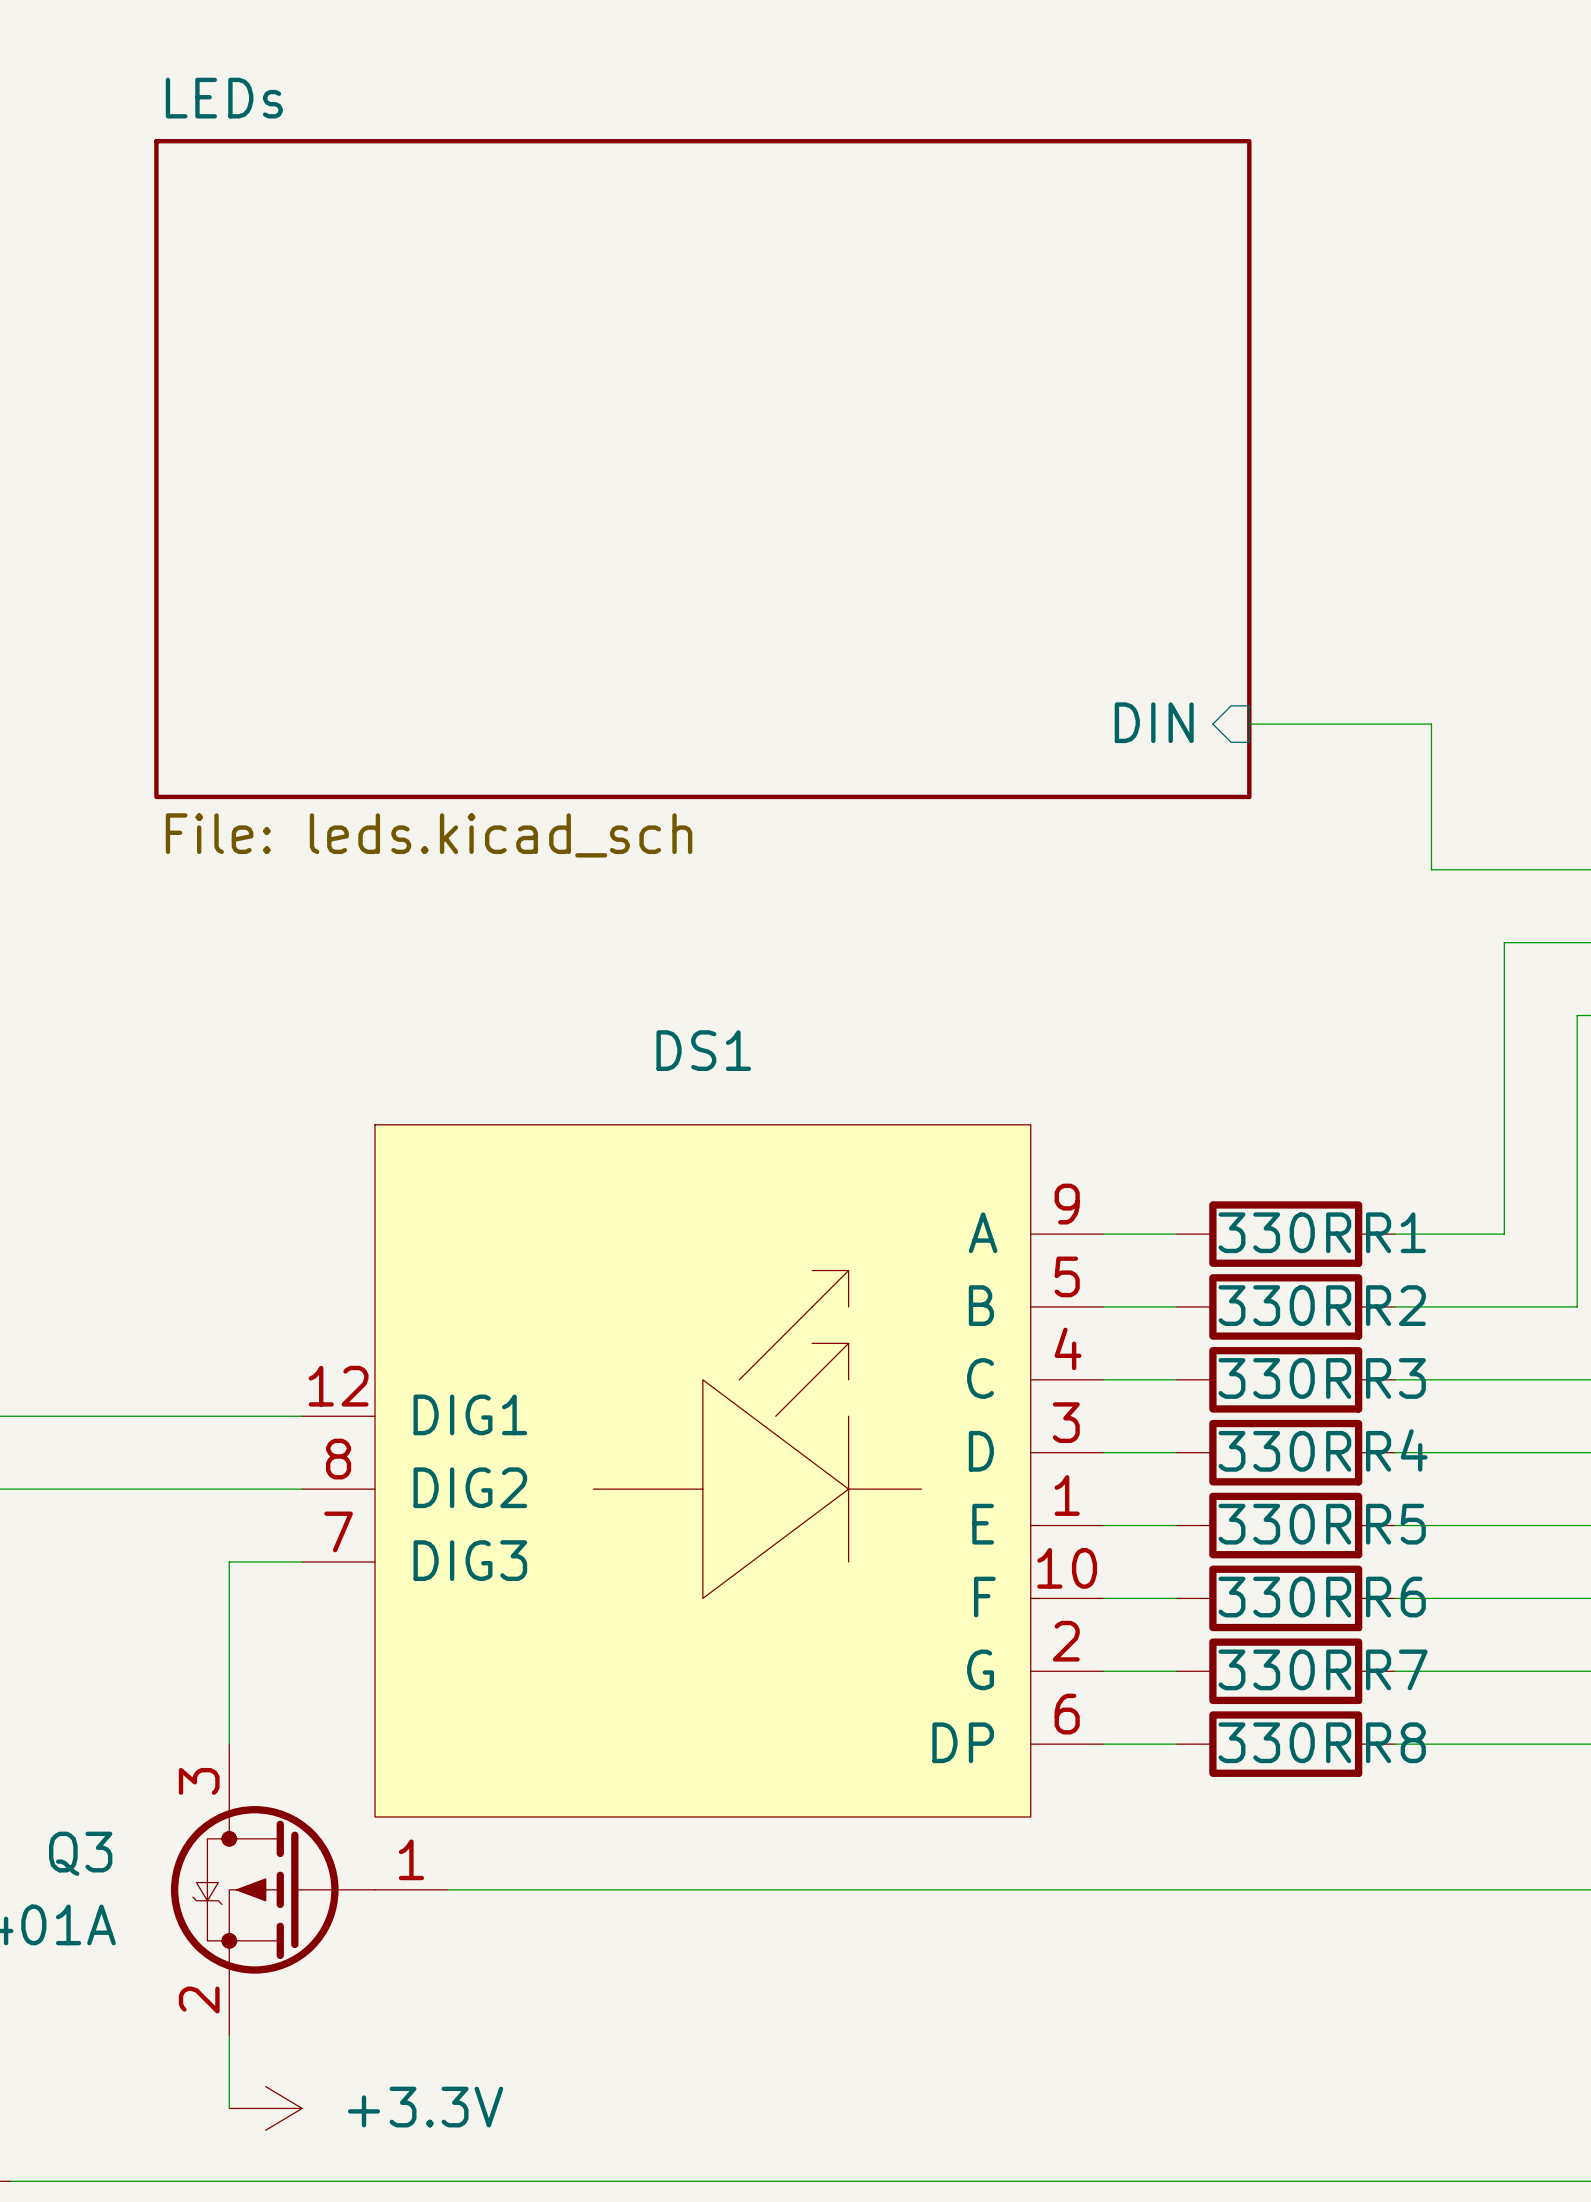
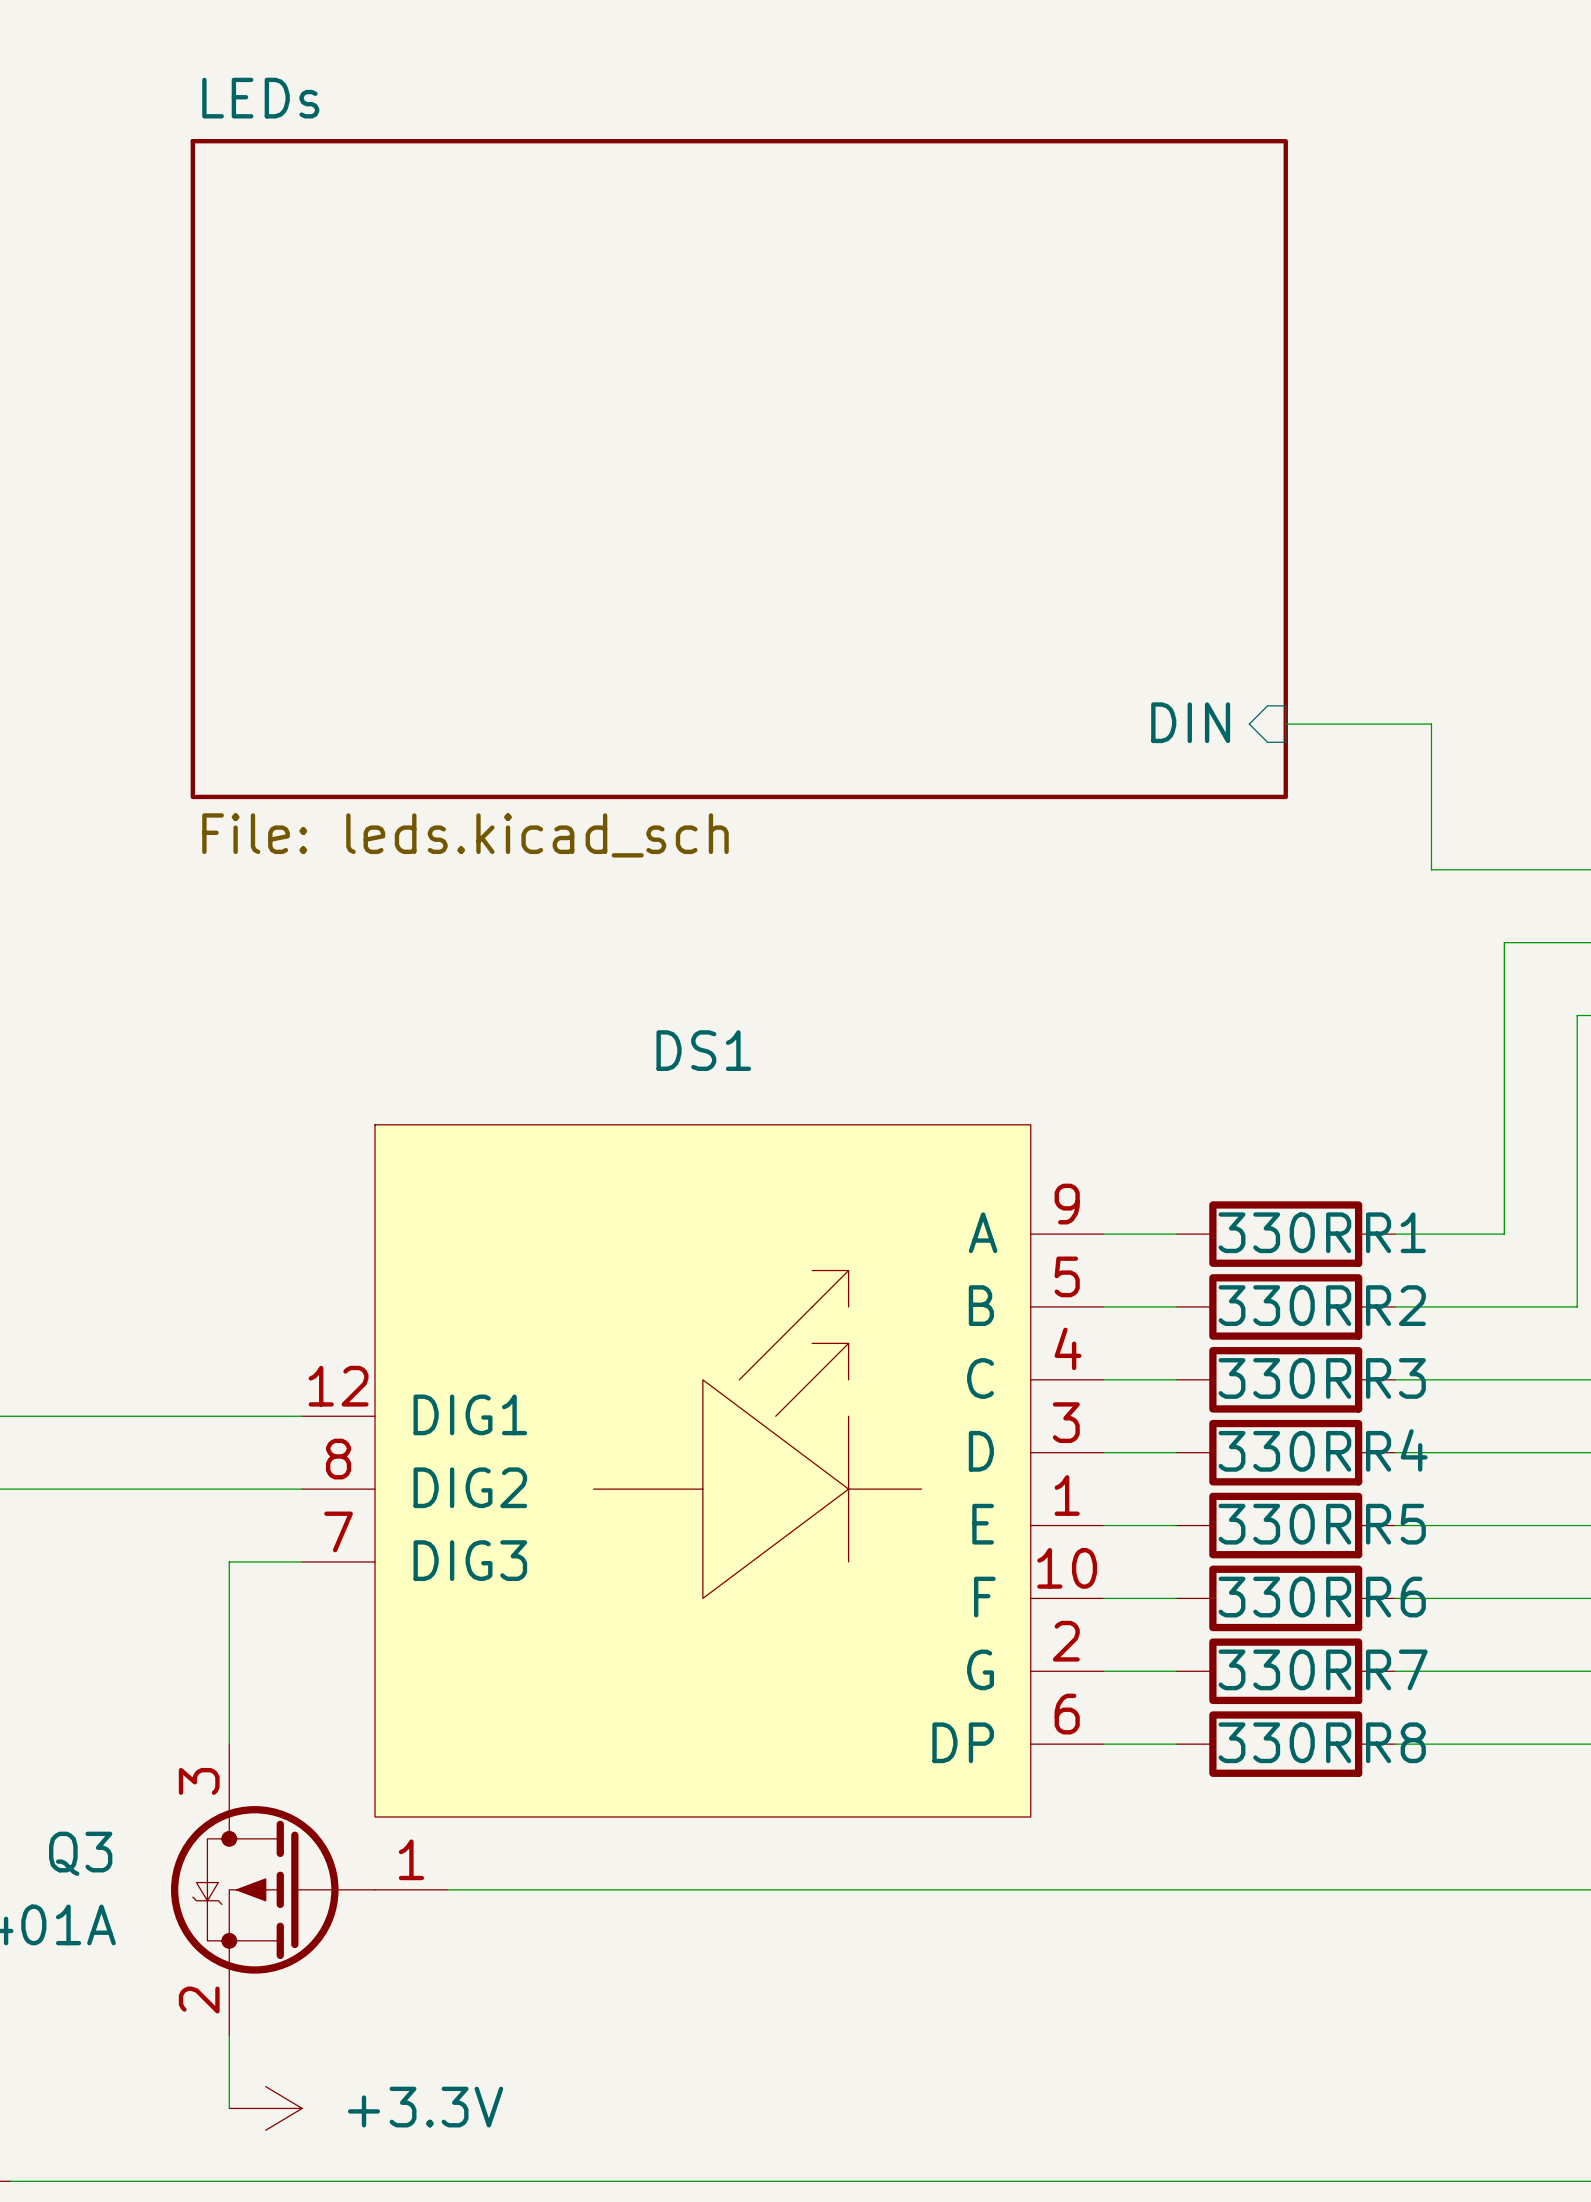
sheet LEDs position: (702, 469) -> (739, 469)
sheet pin position: DIN (1154, 722) -> DIN (1190, 722)
wire: (1249, 724) (1285, 724) -> none

